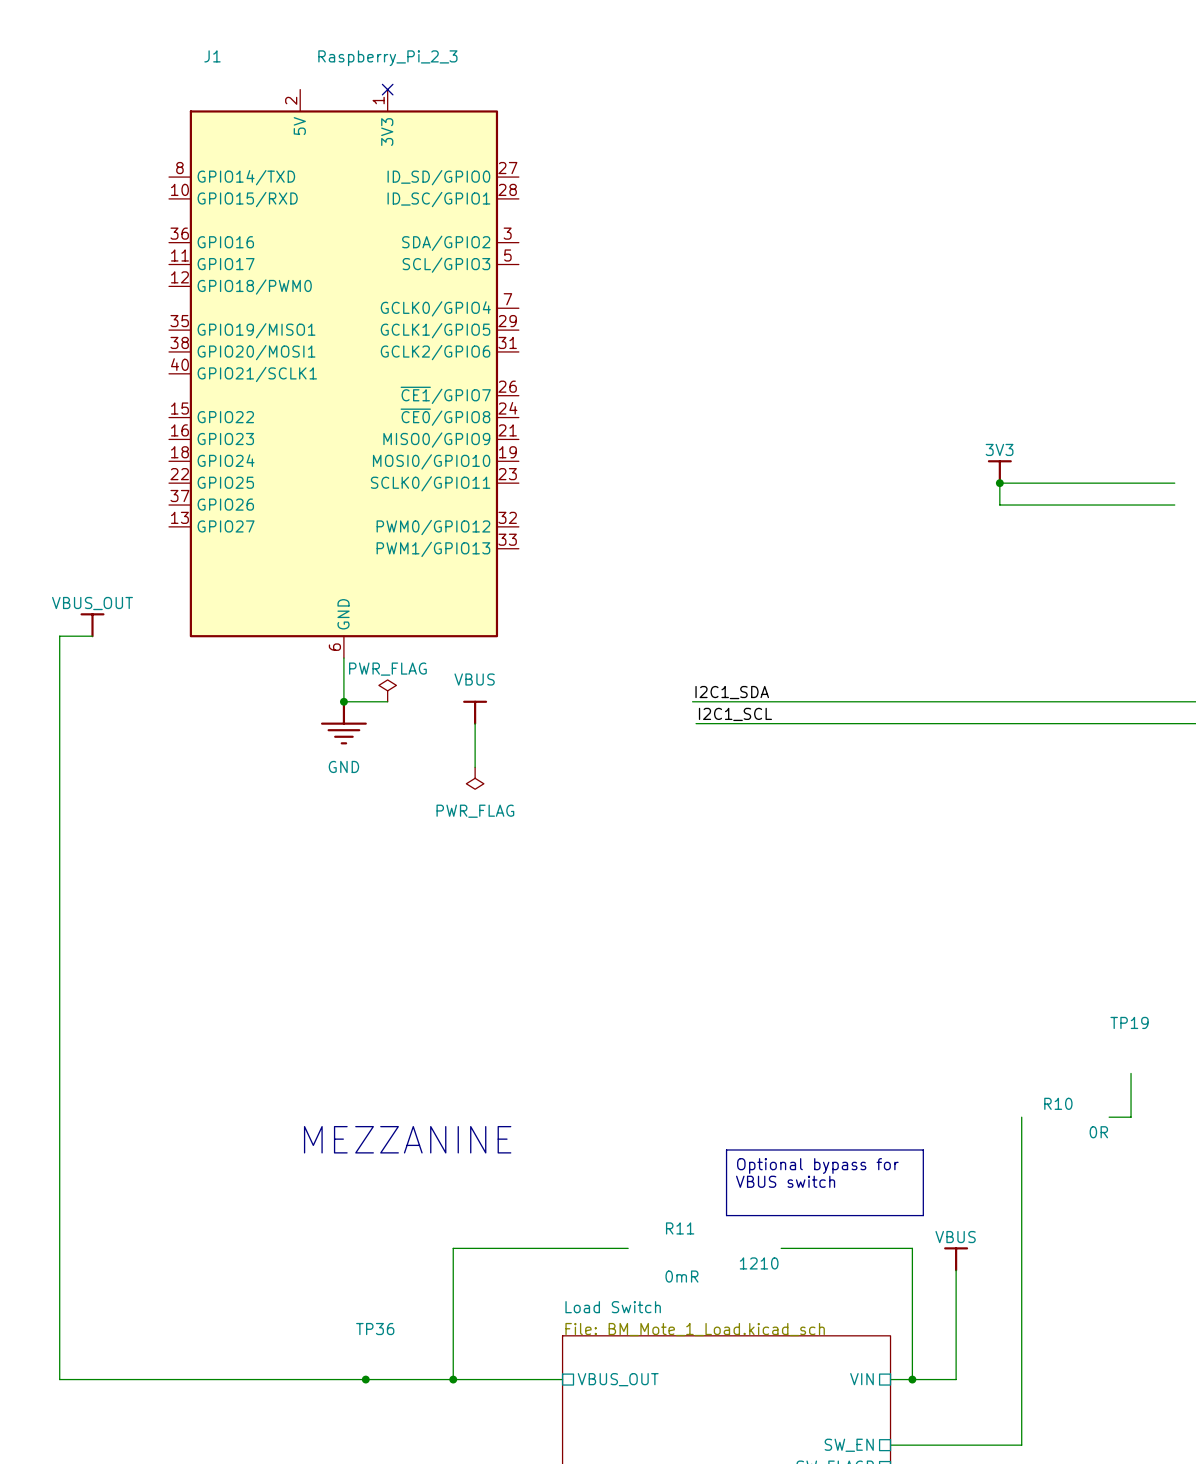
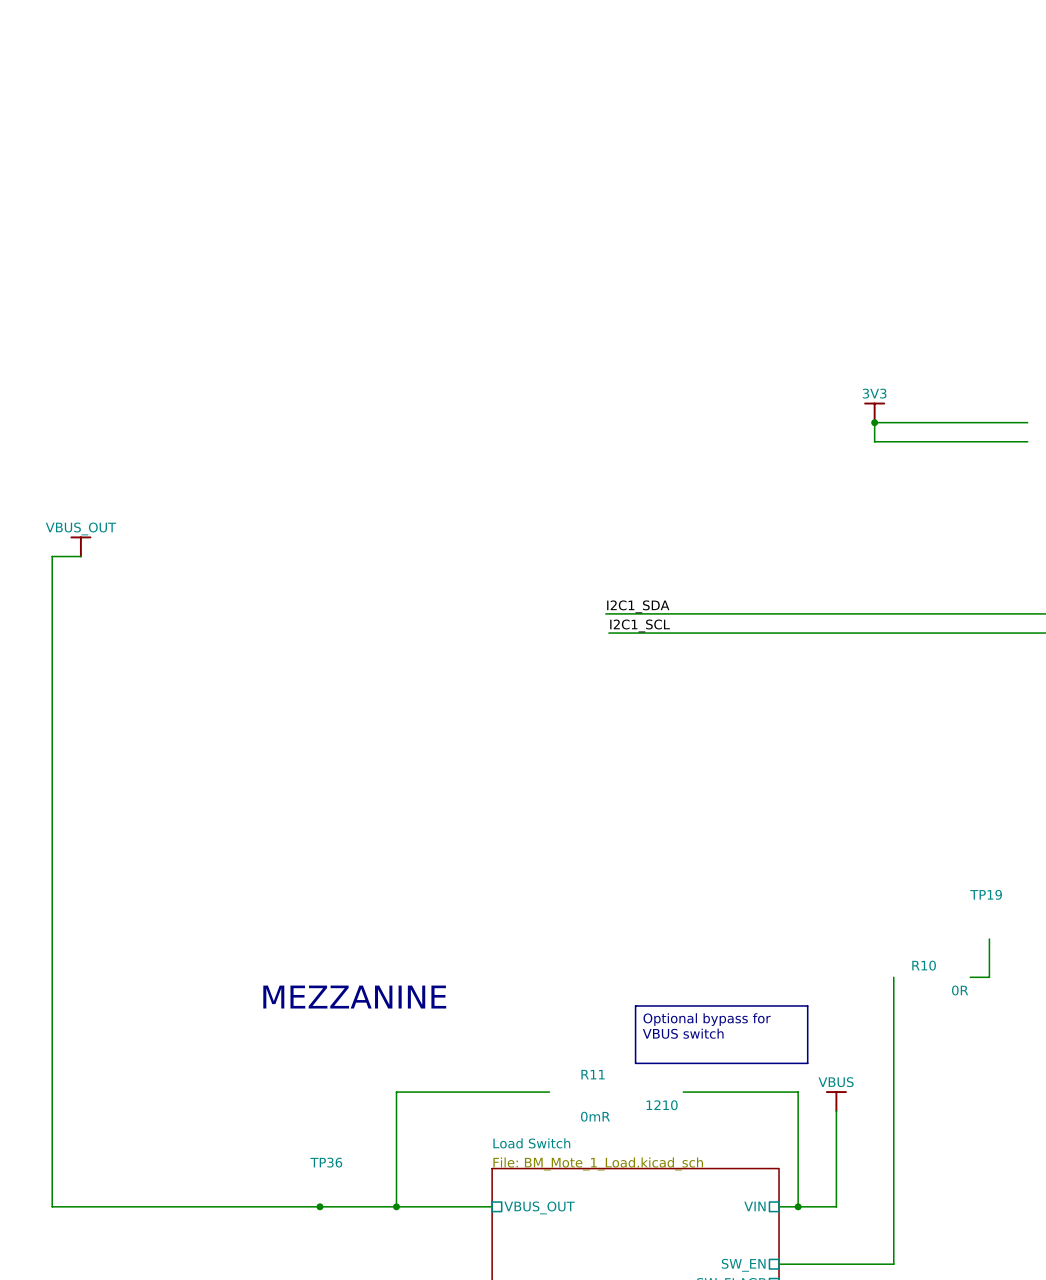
no-connect mark: (387, 89) -> none
J1: Raspberry_Pi_2_3 (343, 373) -> none
wire: (343, 658) (343, 701) (387, 701) -> none
power symbol: PWR_FLAG (387, 690) -> none
junction: (343, 701) -> none
power symbol: VBUS (475, 712) -> none
power symbol: GND (343, 722) -> none
wire: (475, 723) (475, 767) -> none
power symbol: PWR_FLAG (475, 778) -> none

